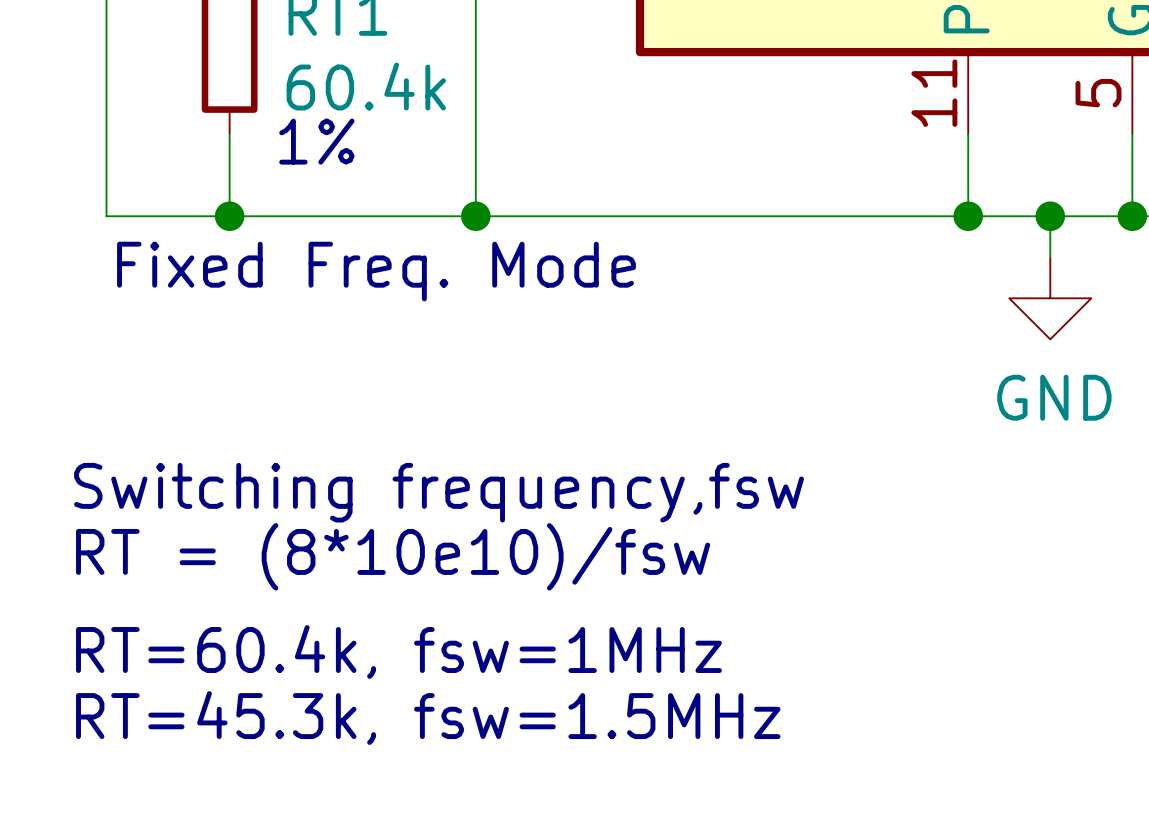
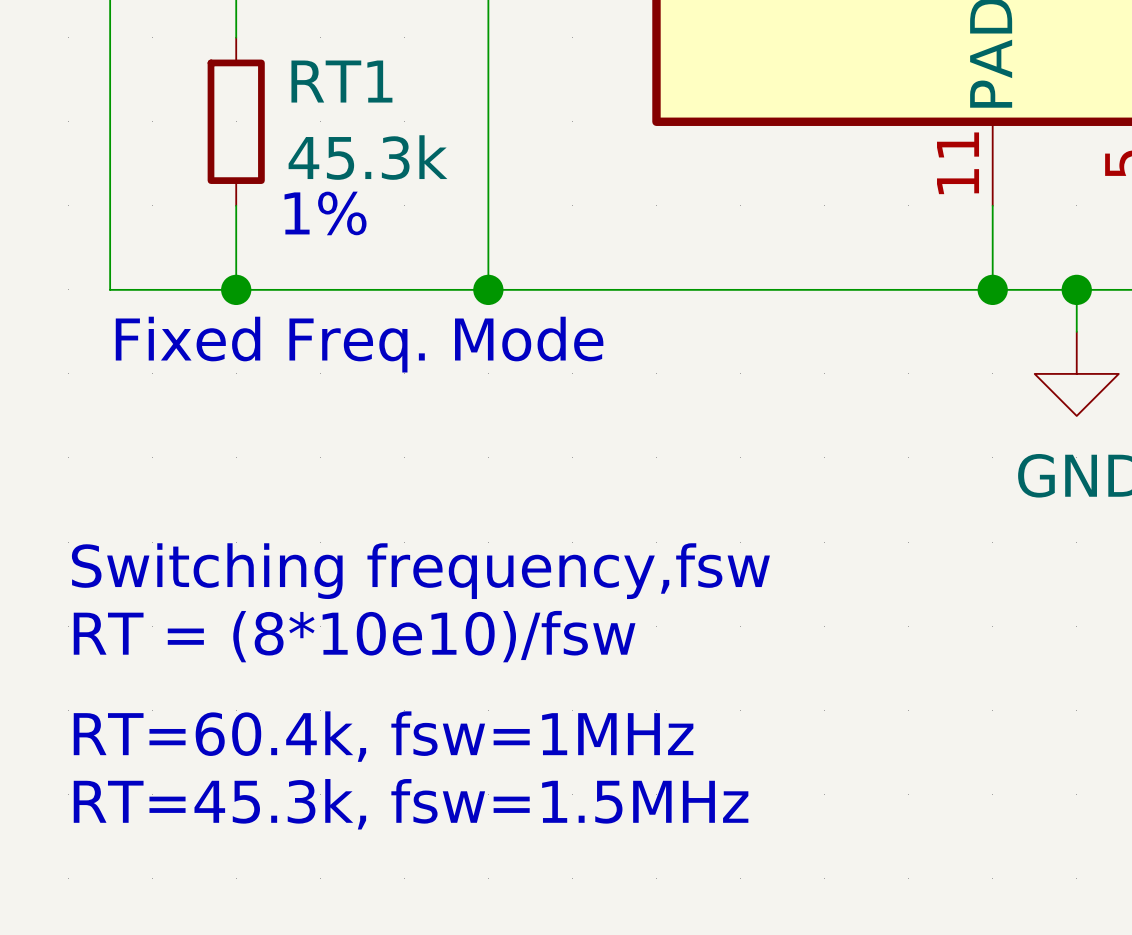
RT1 value: 60.4k (366, 86) -> 45.3k (367, 157)

